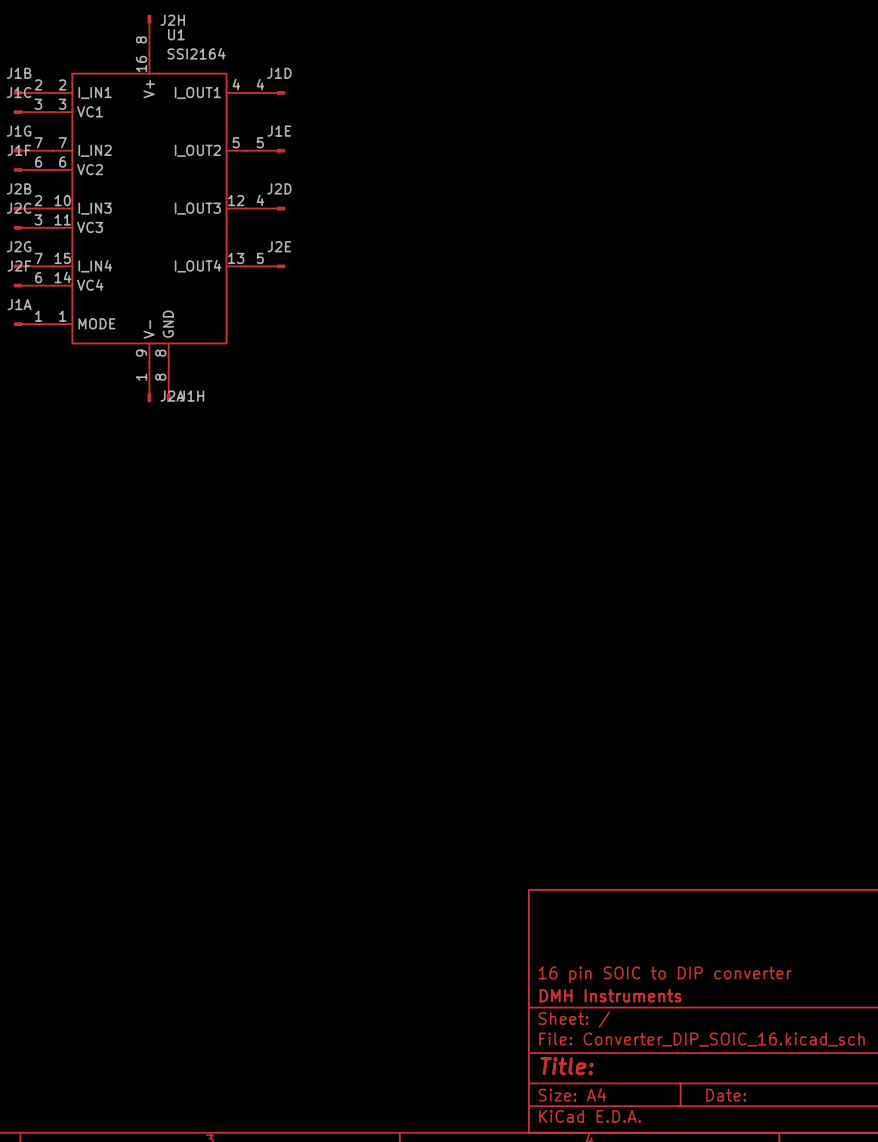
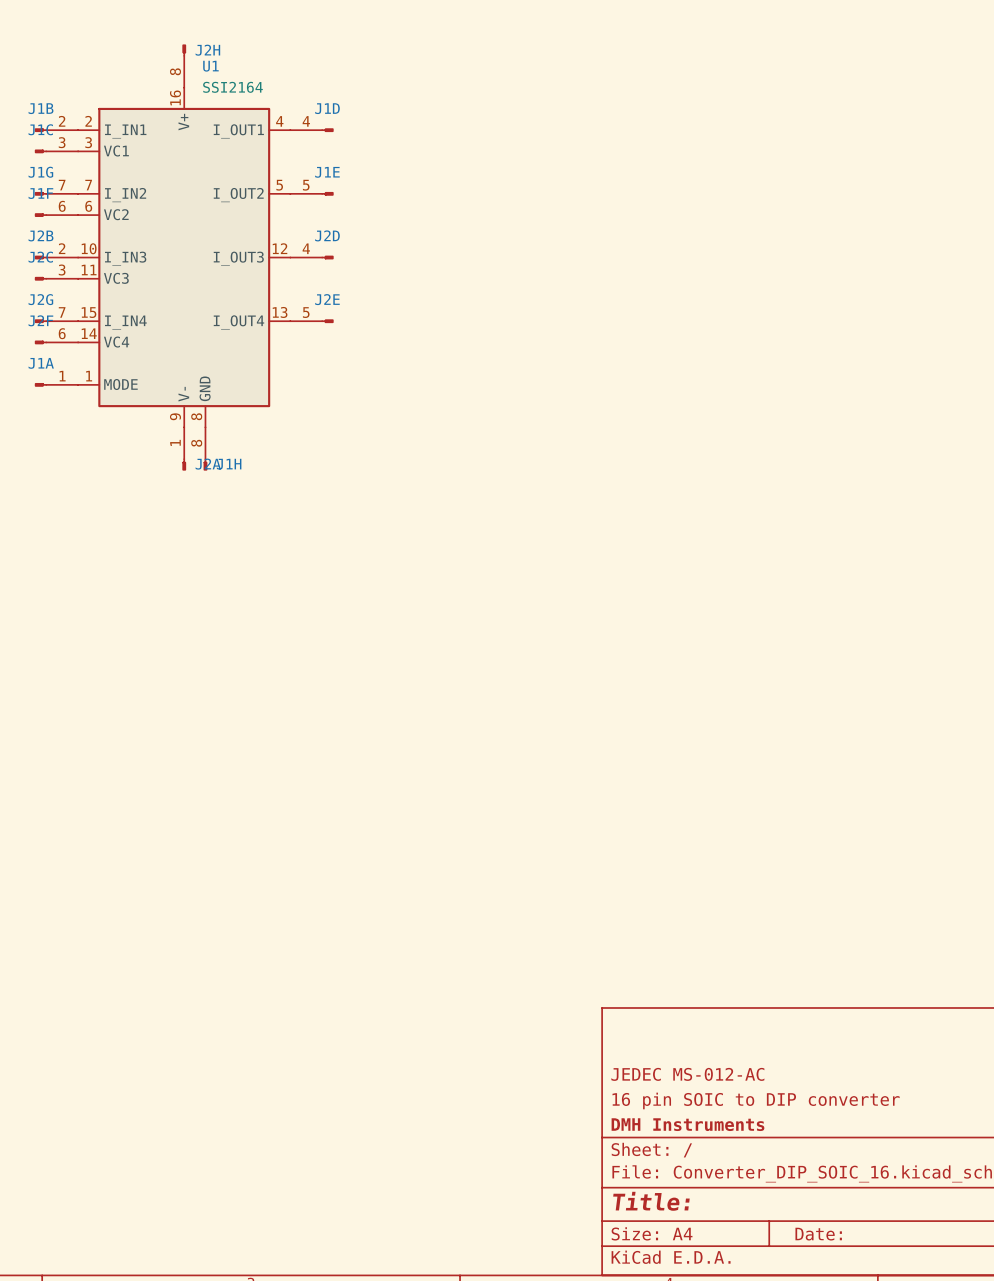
title block: none -> JEDEC MS-012-AC (687, 1074)

